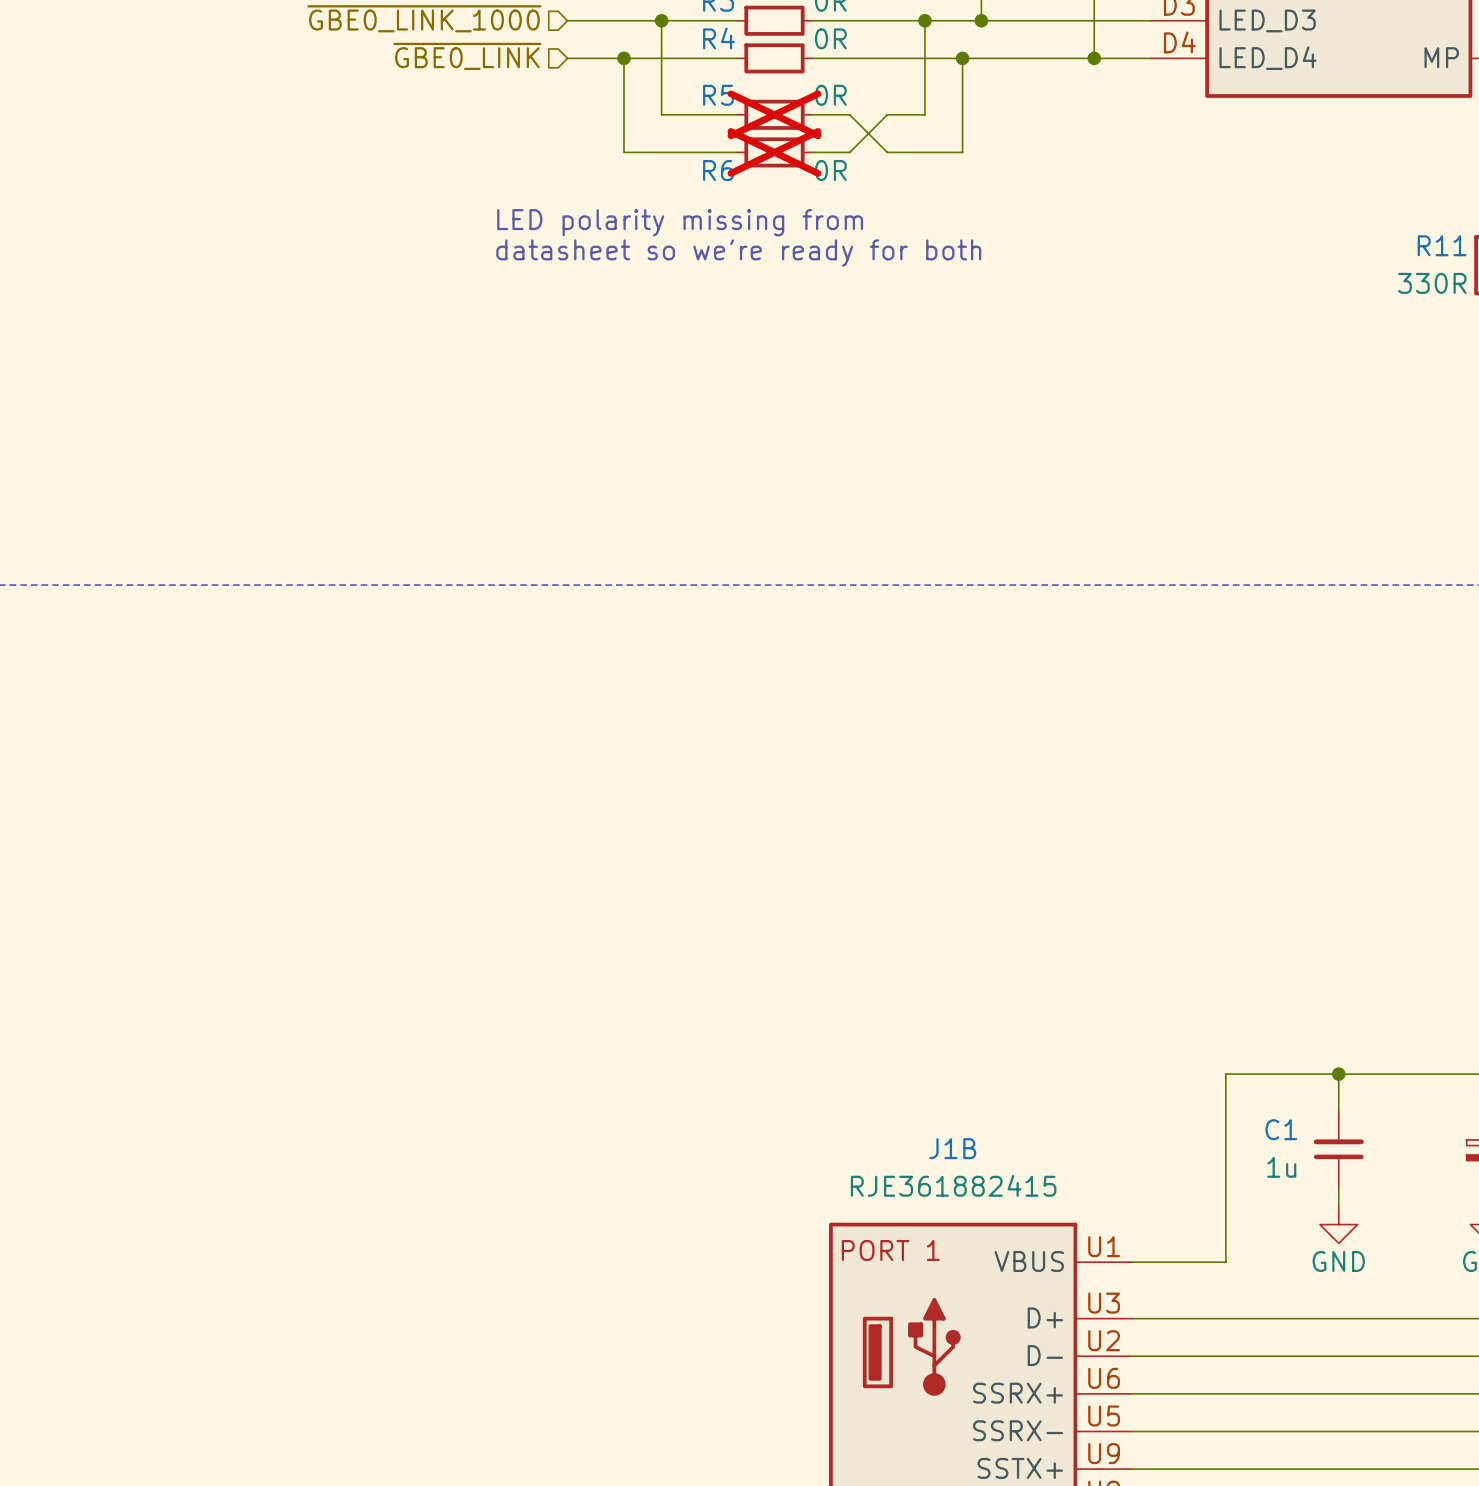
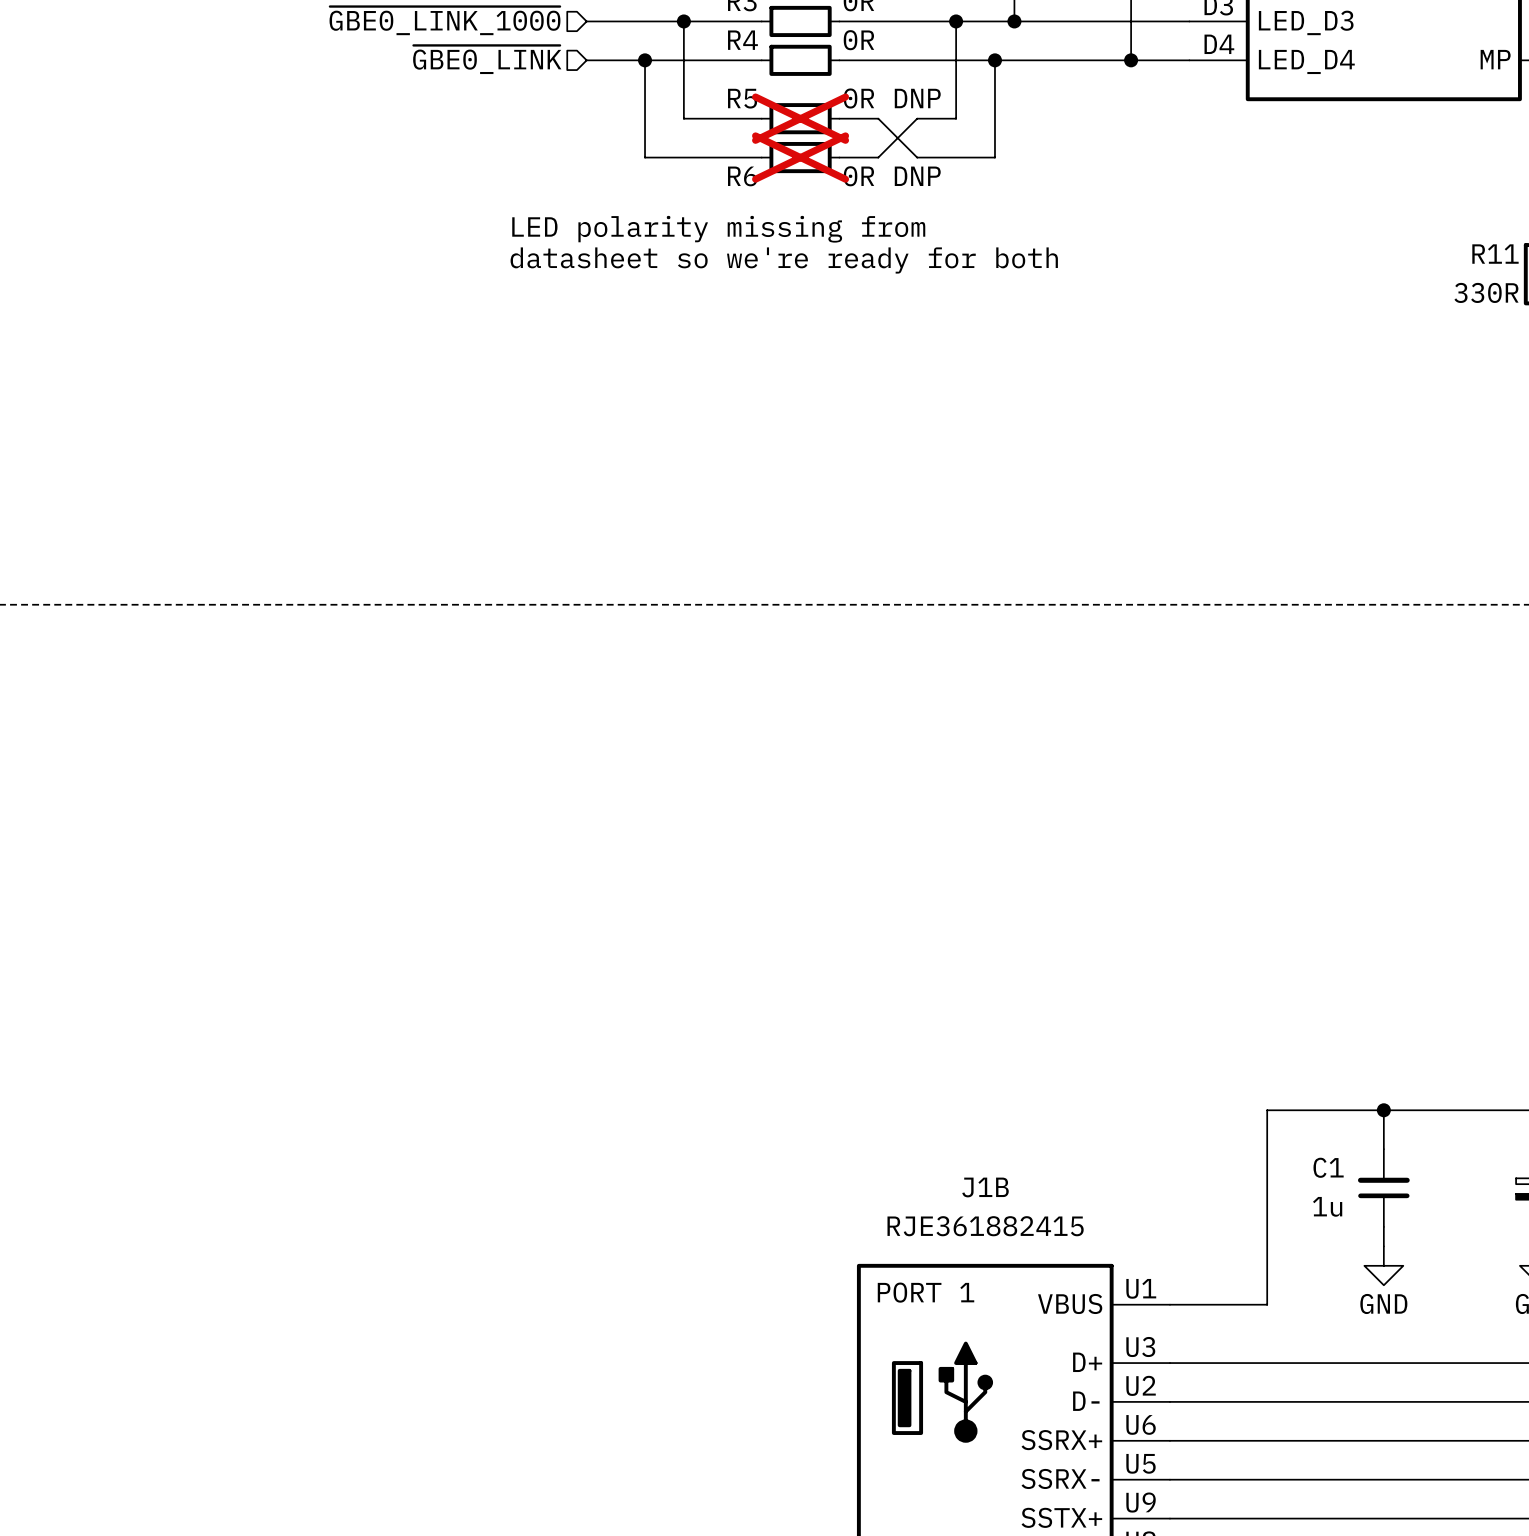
R5 text: none -> DNP (917, 98)
R6 text: none -> DNP (917, 176)

